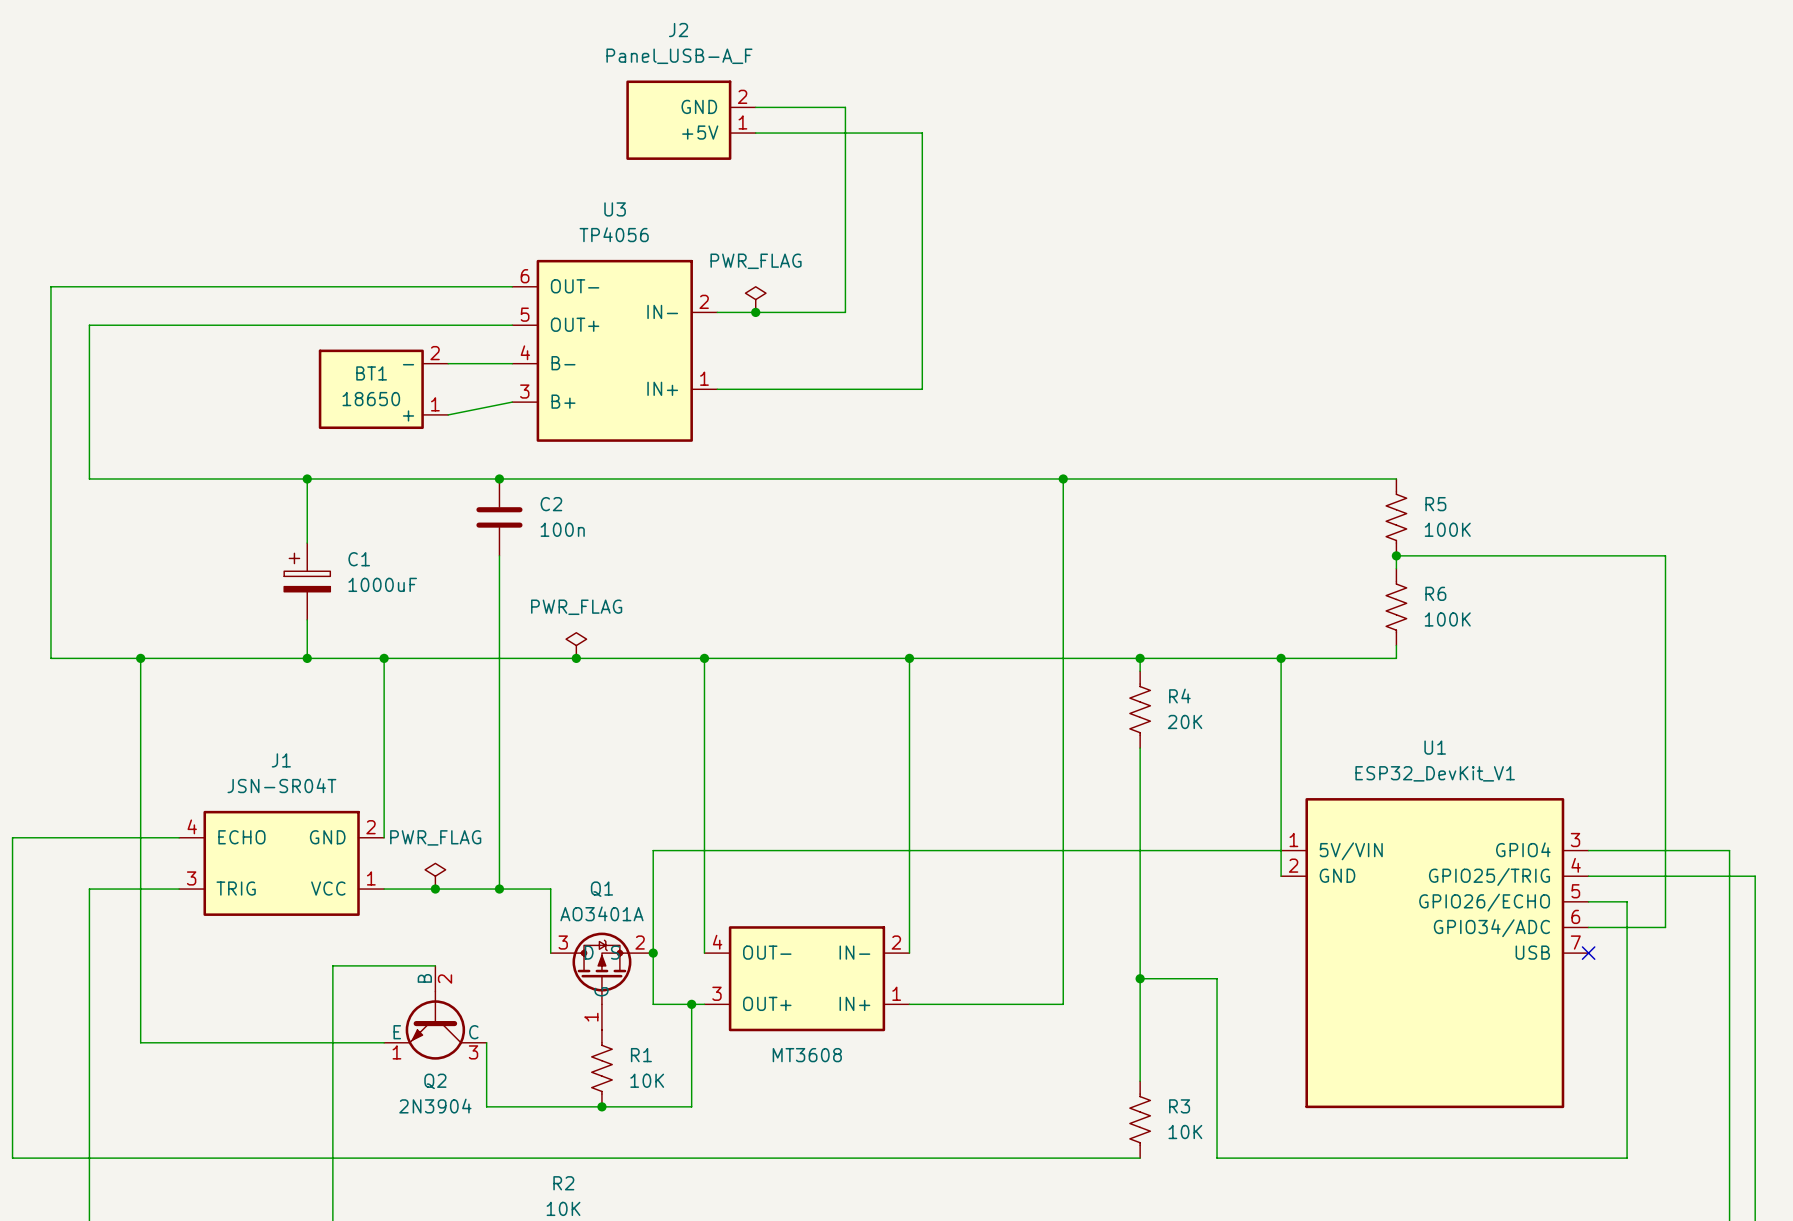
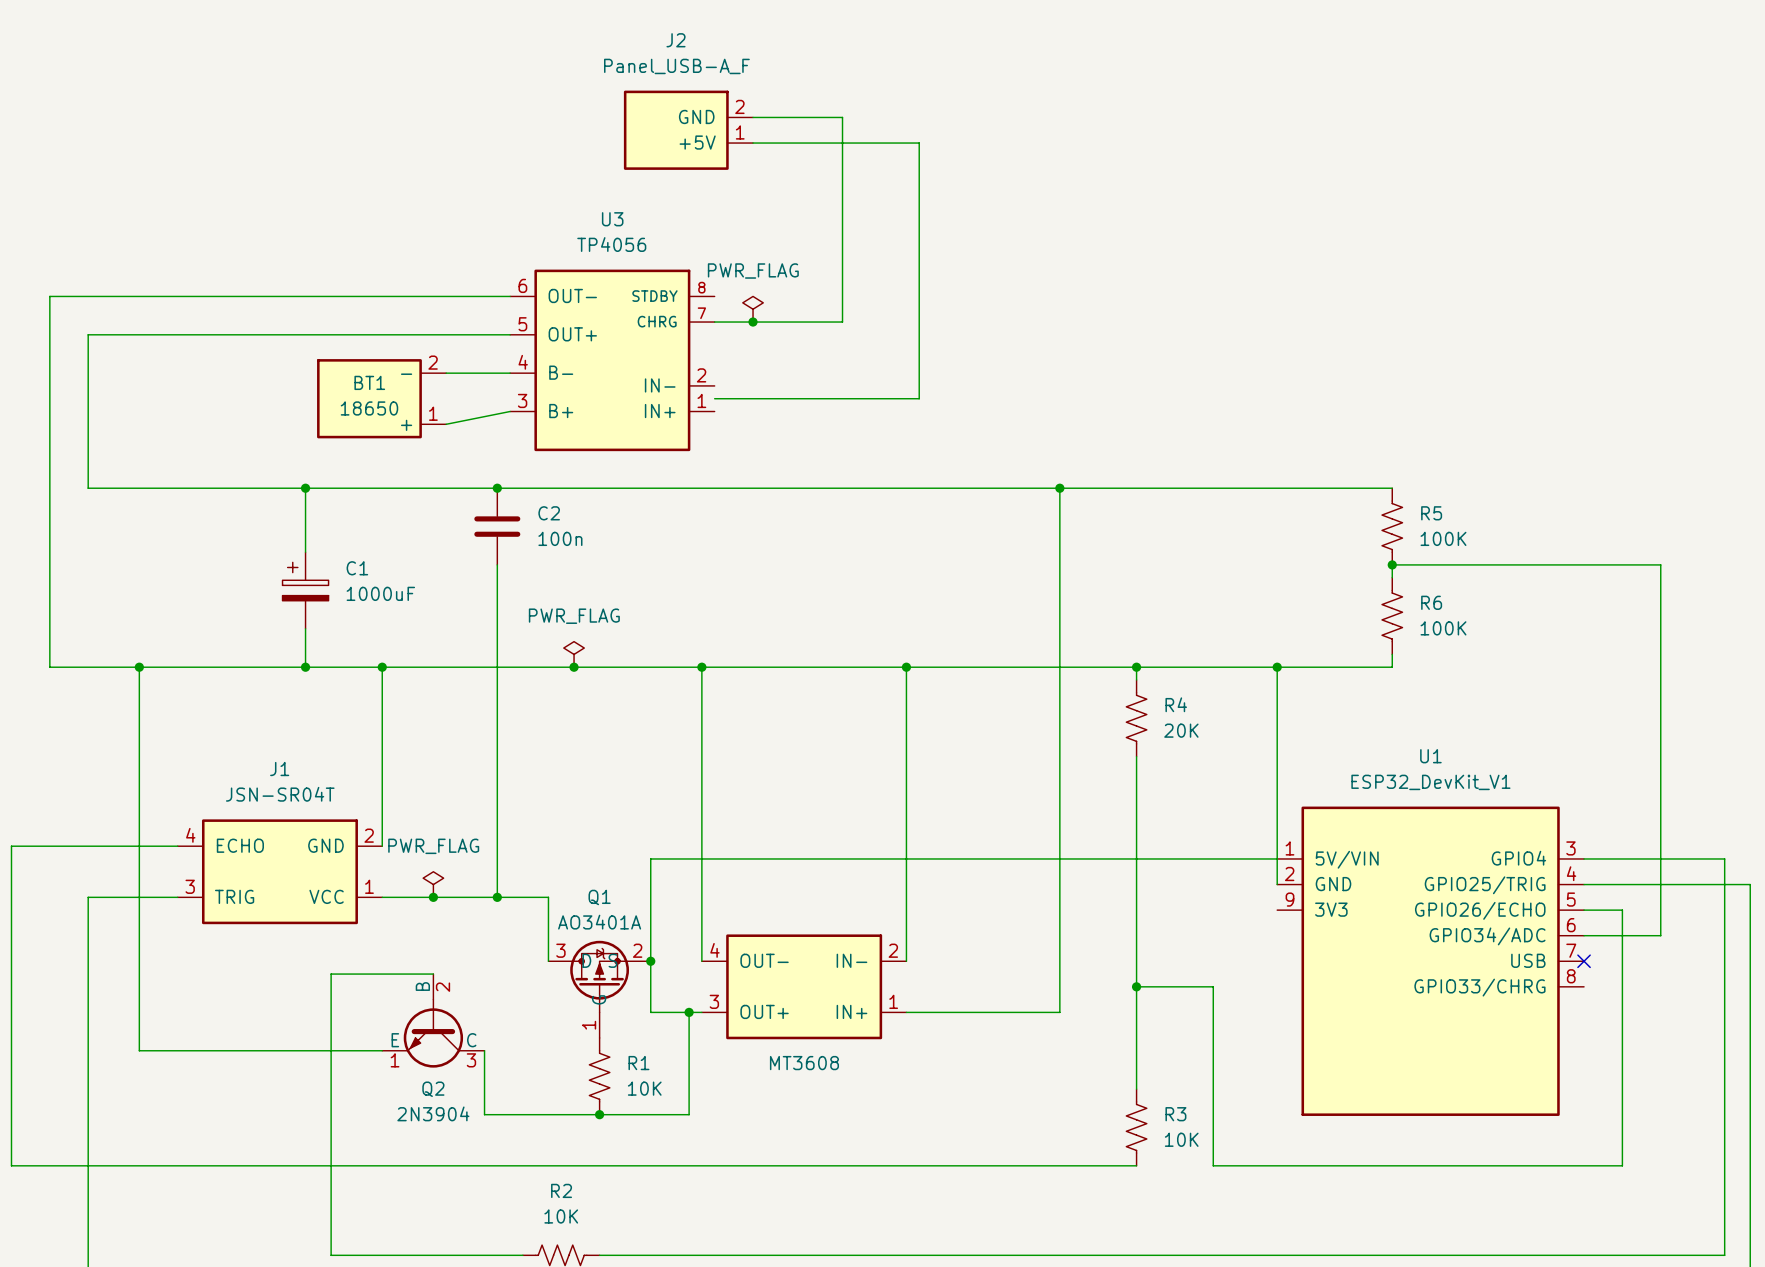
U3 symbol: [512, 259, 718, 442] -> [510, 269, 715, 452]
U1 symbol: [1281, 798, 1589, 1109] -> [1277, 806, 1585, 1116]

